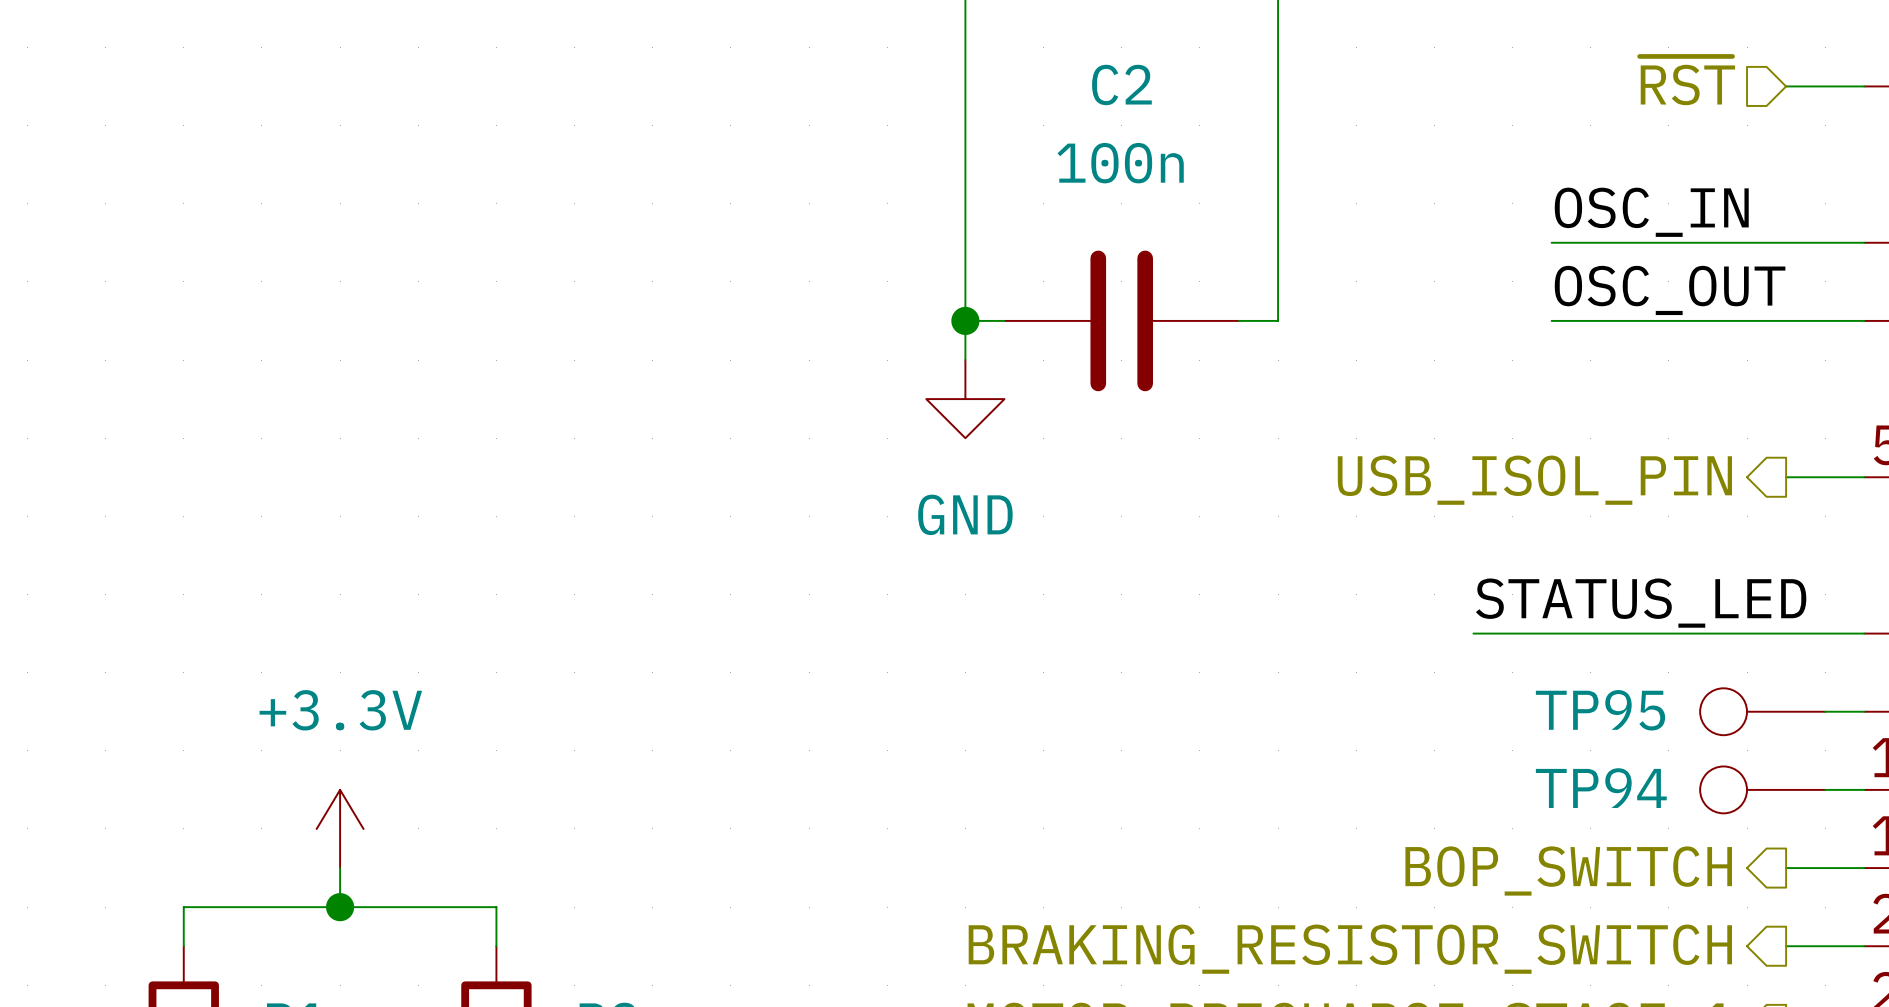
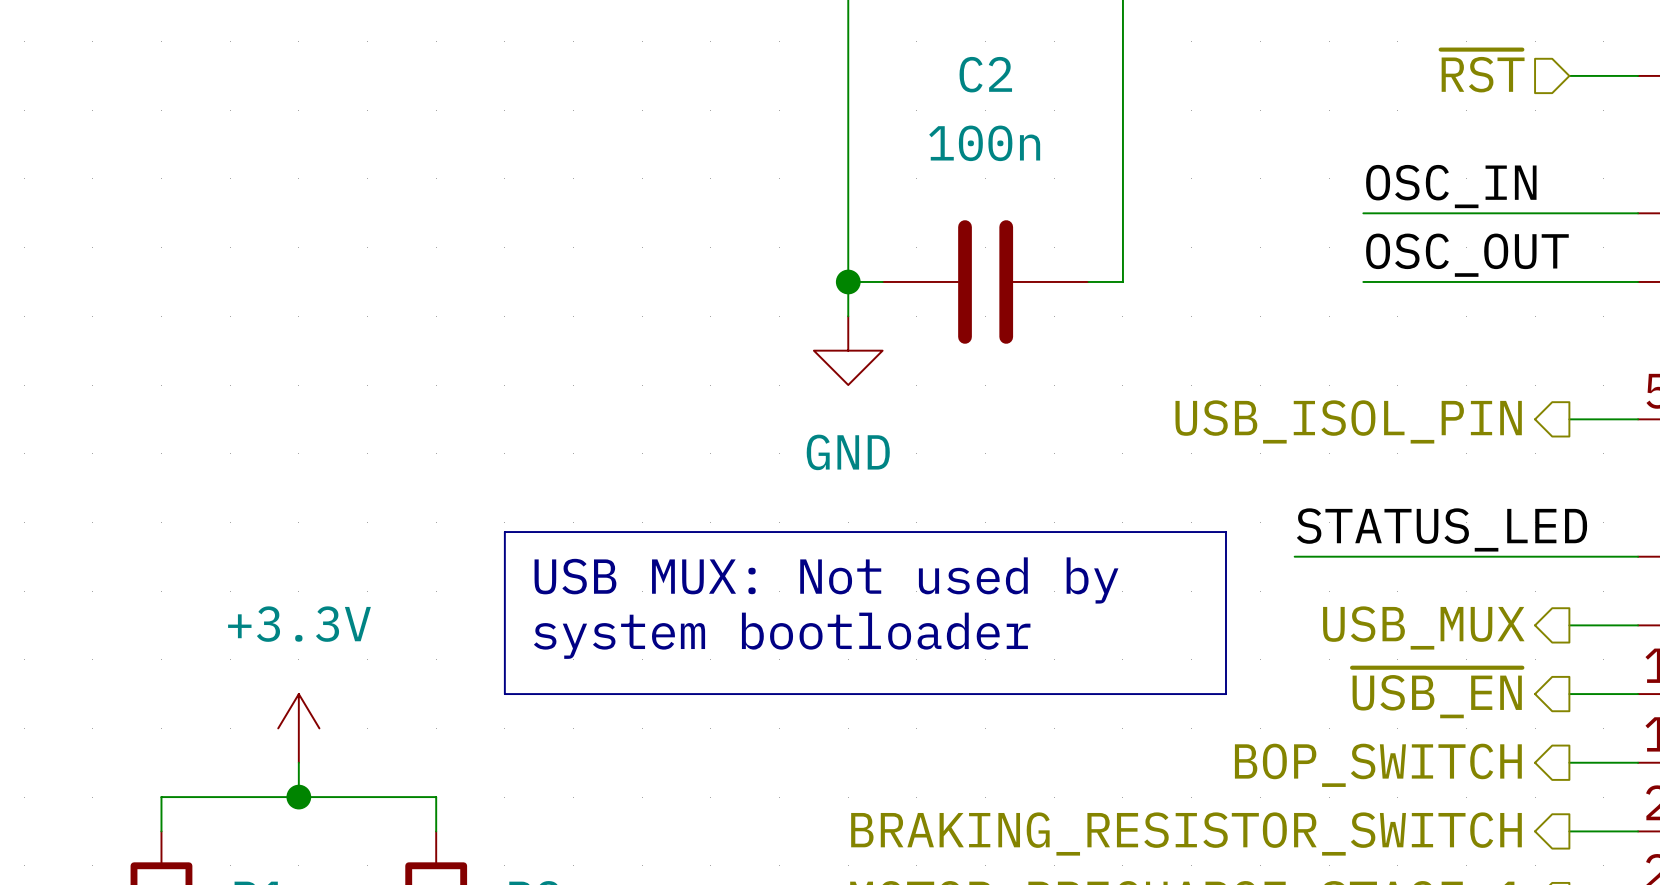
line: none -> (504, 532) (1225, 532) (1225, 694) (504, 694) (504, 532)
text: none -> USB MUX: Not used by (826, 580)
TP95: (1762, 711) -> none
hierarchical label: none -> USB_MUX (1423, 627)
text: none -> system bootloader (782, 635)
hierarchical label: none -> ~{USB_EN} (1437, 692)
TP94: (1762, 789) -> none

